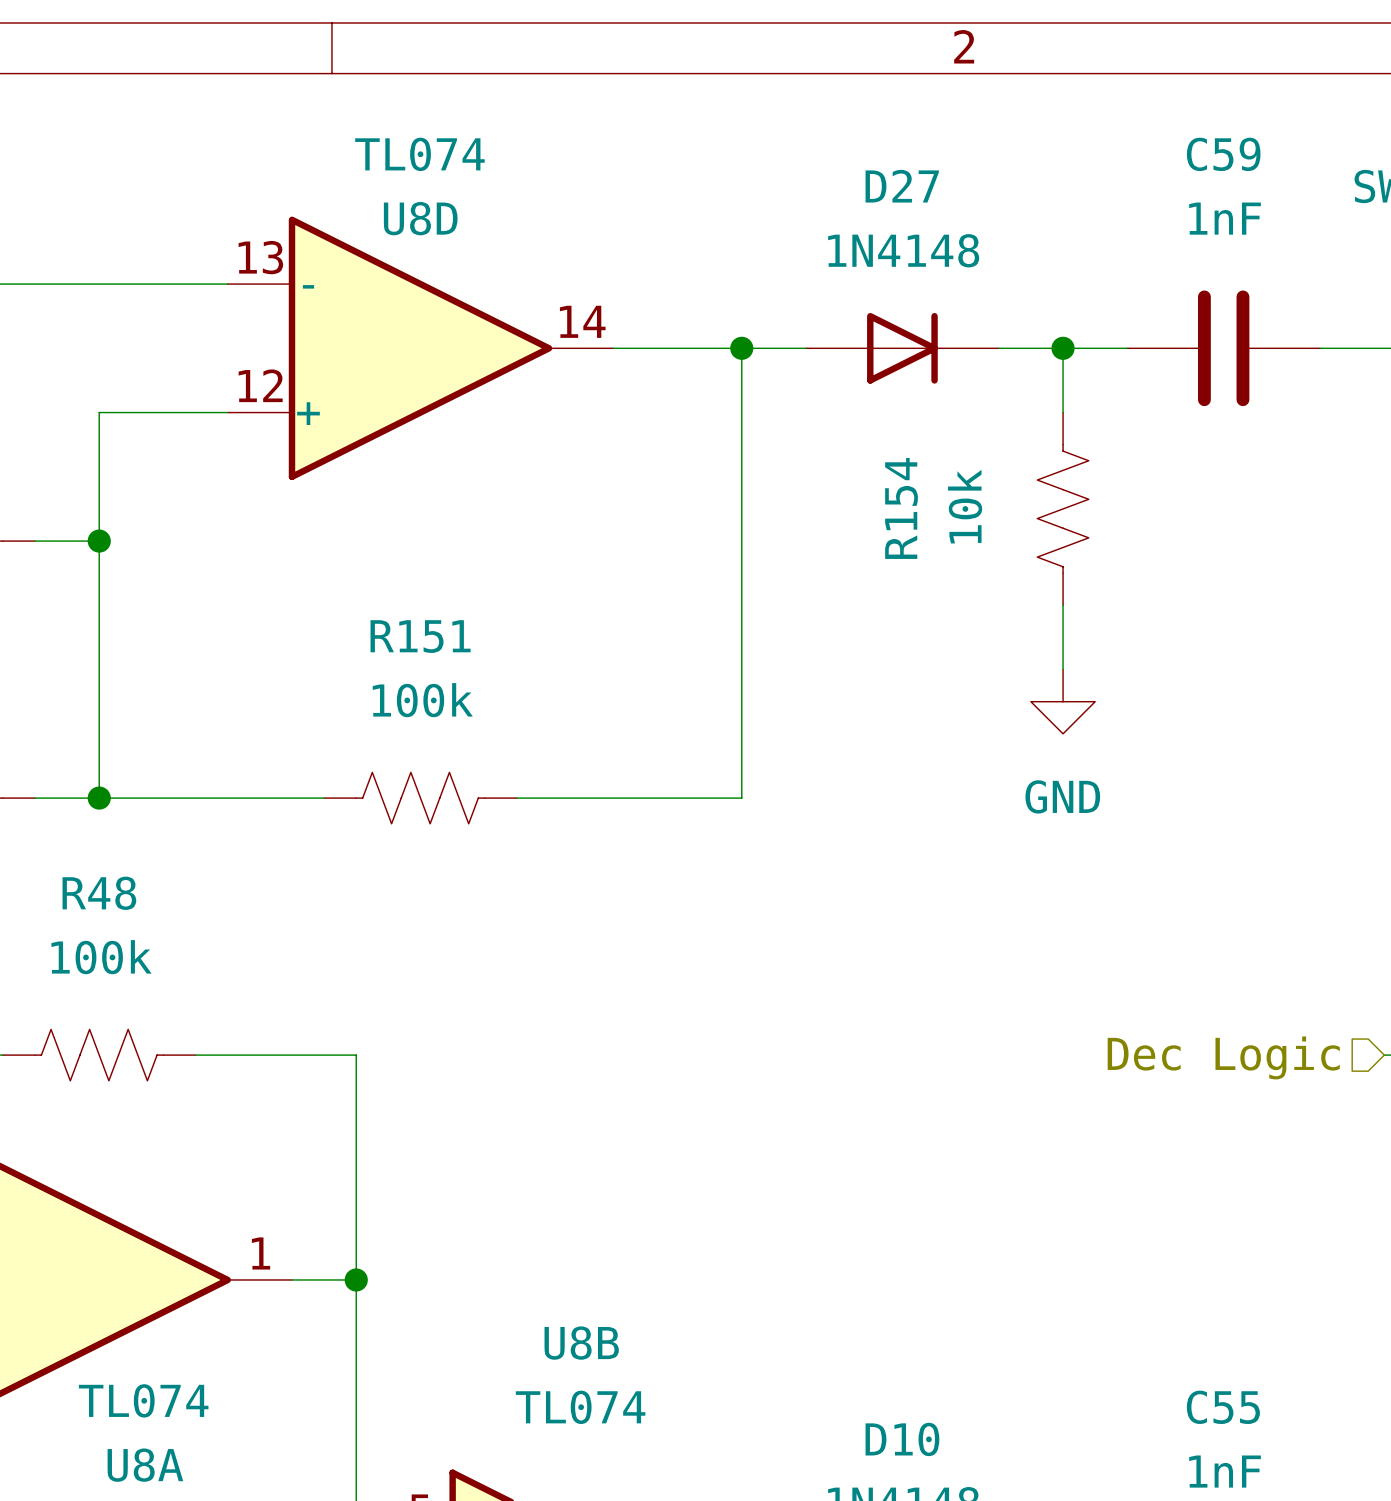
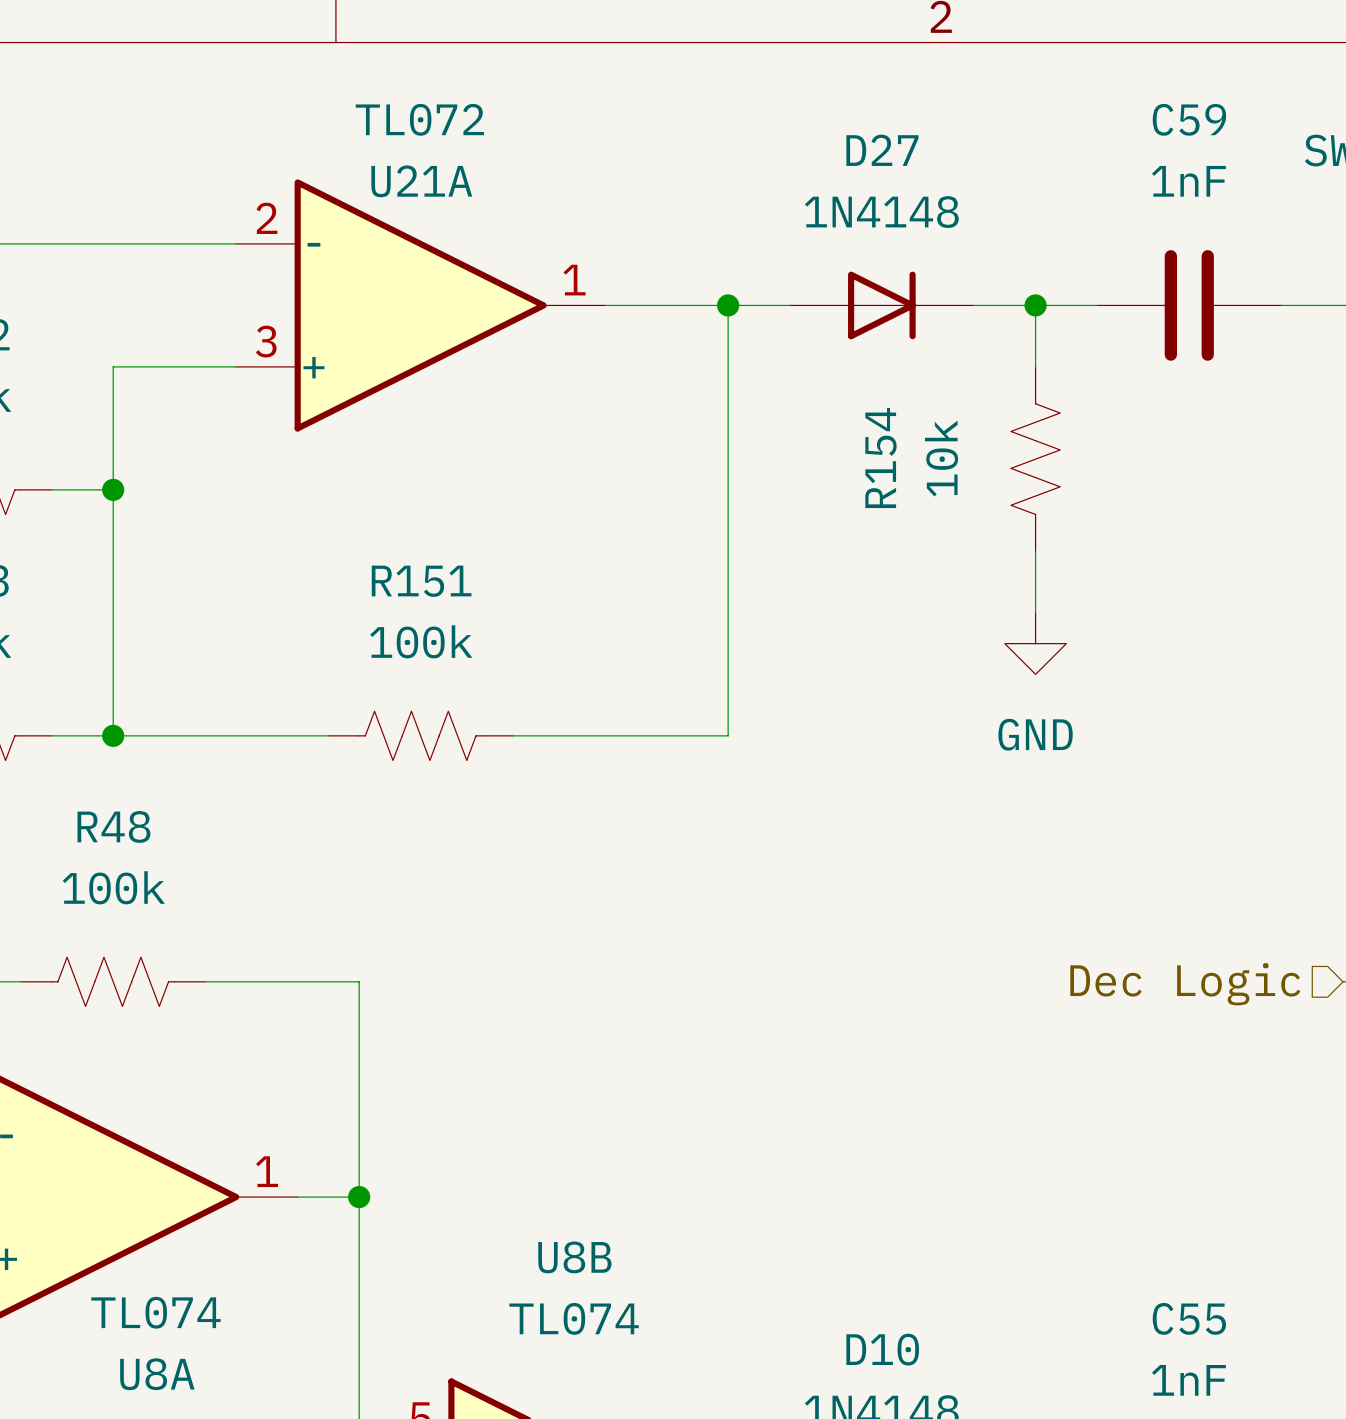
U8D value: TL074 (419, 154) -> TL072 (419, 119)
U8D name: U8D (420, 218) -> U21A (421, 181)
U8D pin number: 13 (260, 257) -> 2 (266, 218)
U8D pin number: 14 (582, 321) -> 1 (574, 280)
U8D pin number: 12 (260, 385) -> 3 (266, 341)

